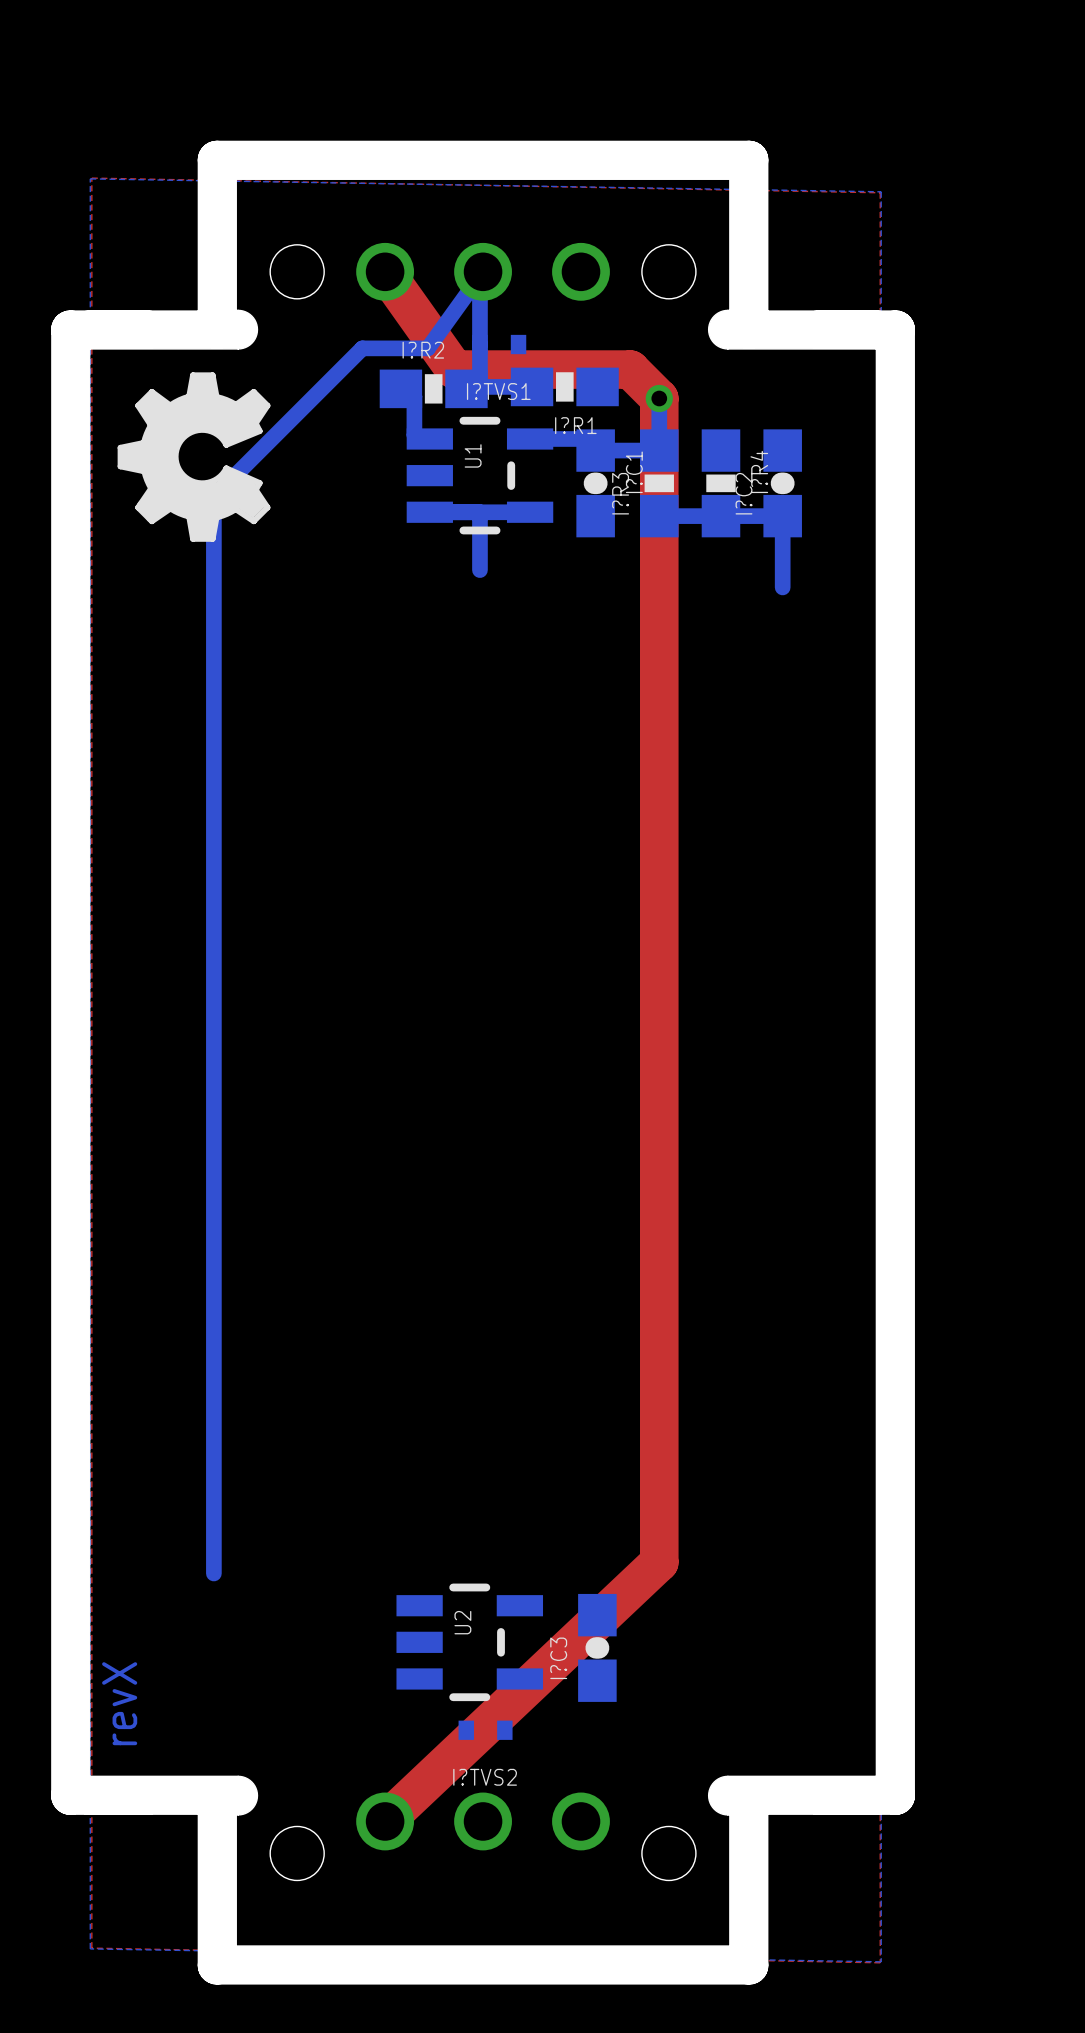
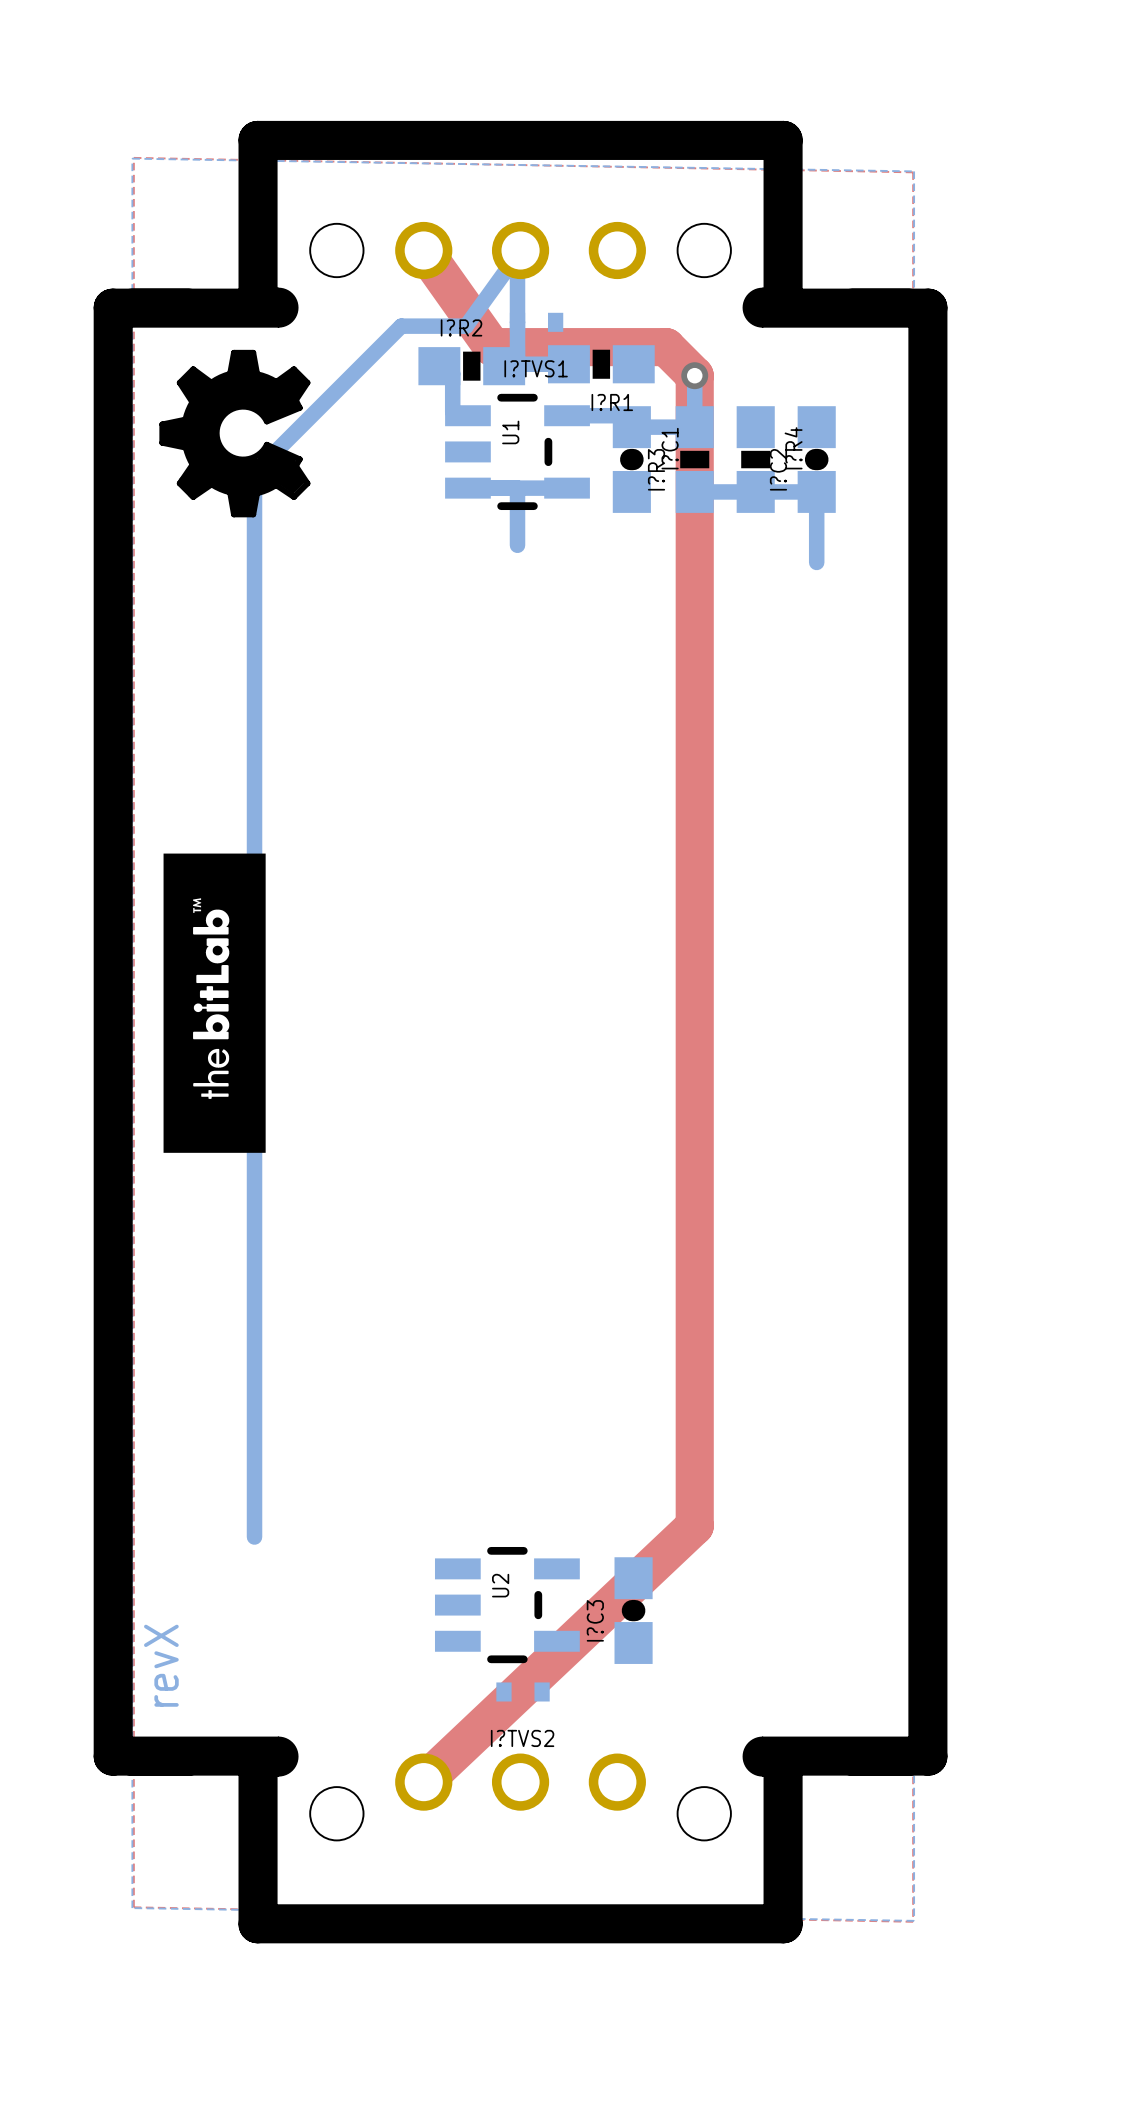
drawing: none -> [163, 853, 266, 1153]

